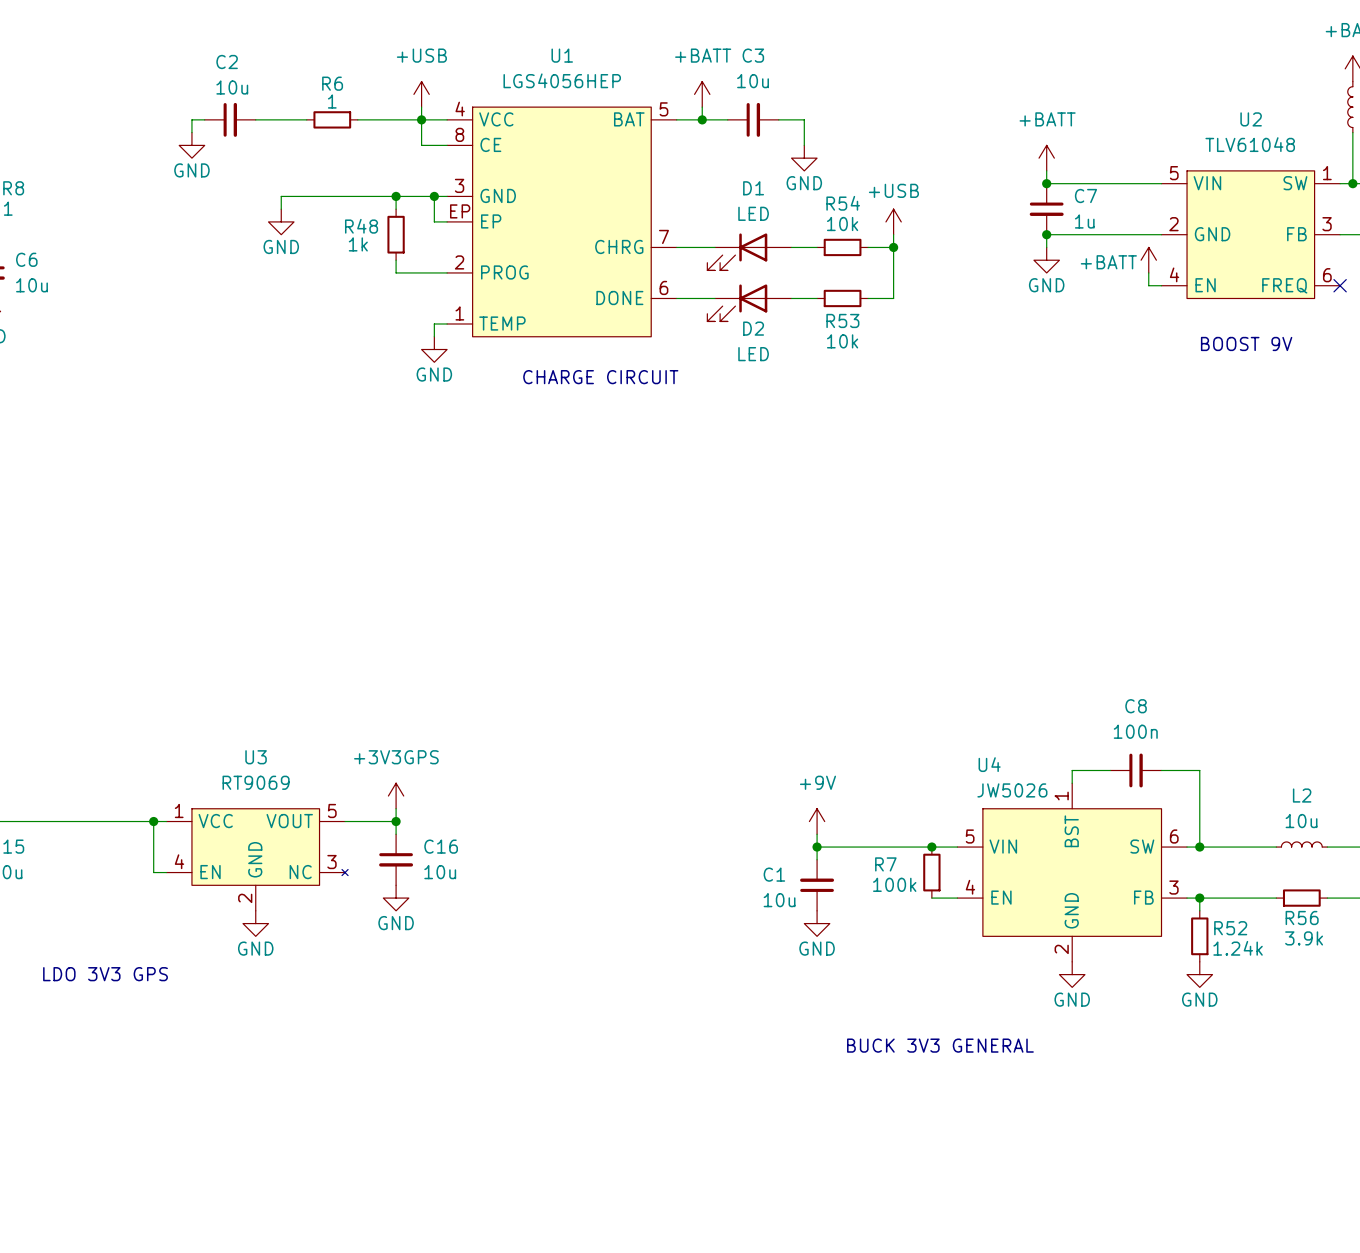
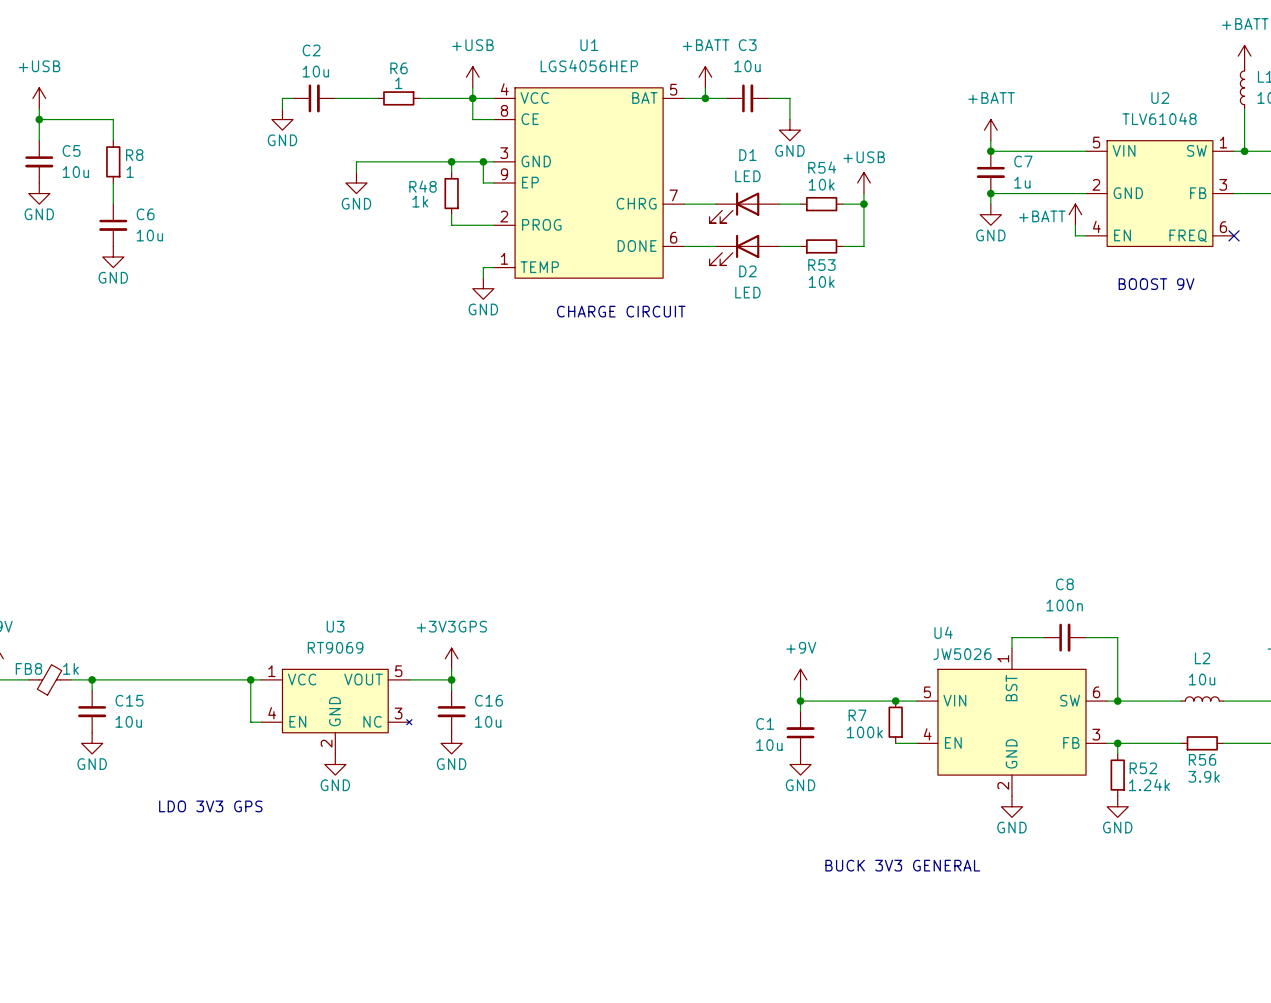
U1 pin number: EP (460, 211) -> 9 (504, 174)

